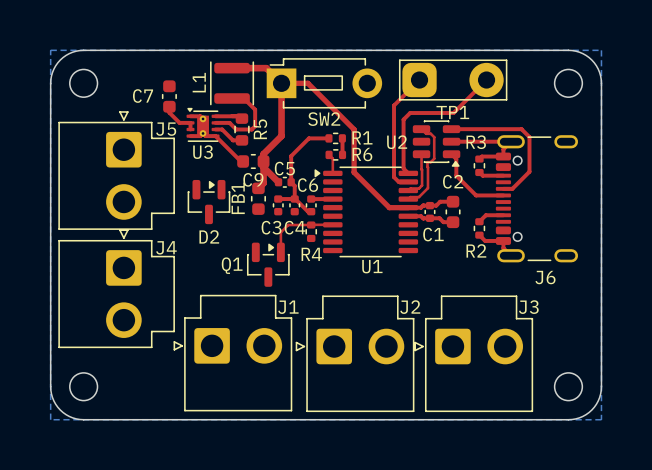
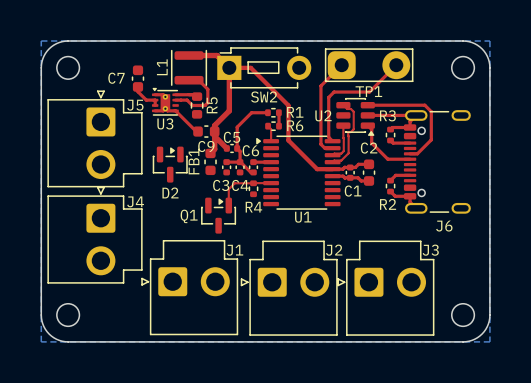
top track: (215, 129) (222, 129) (233, 140) (241, 140) -> none

